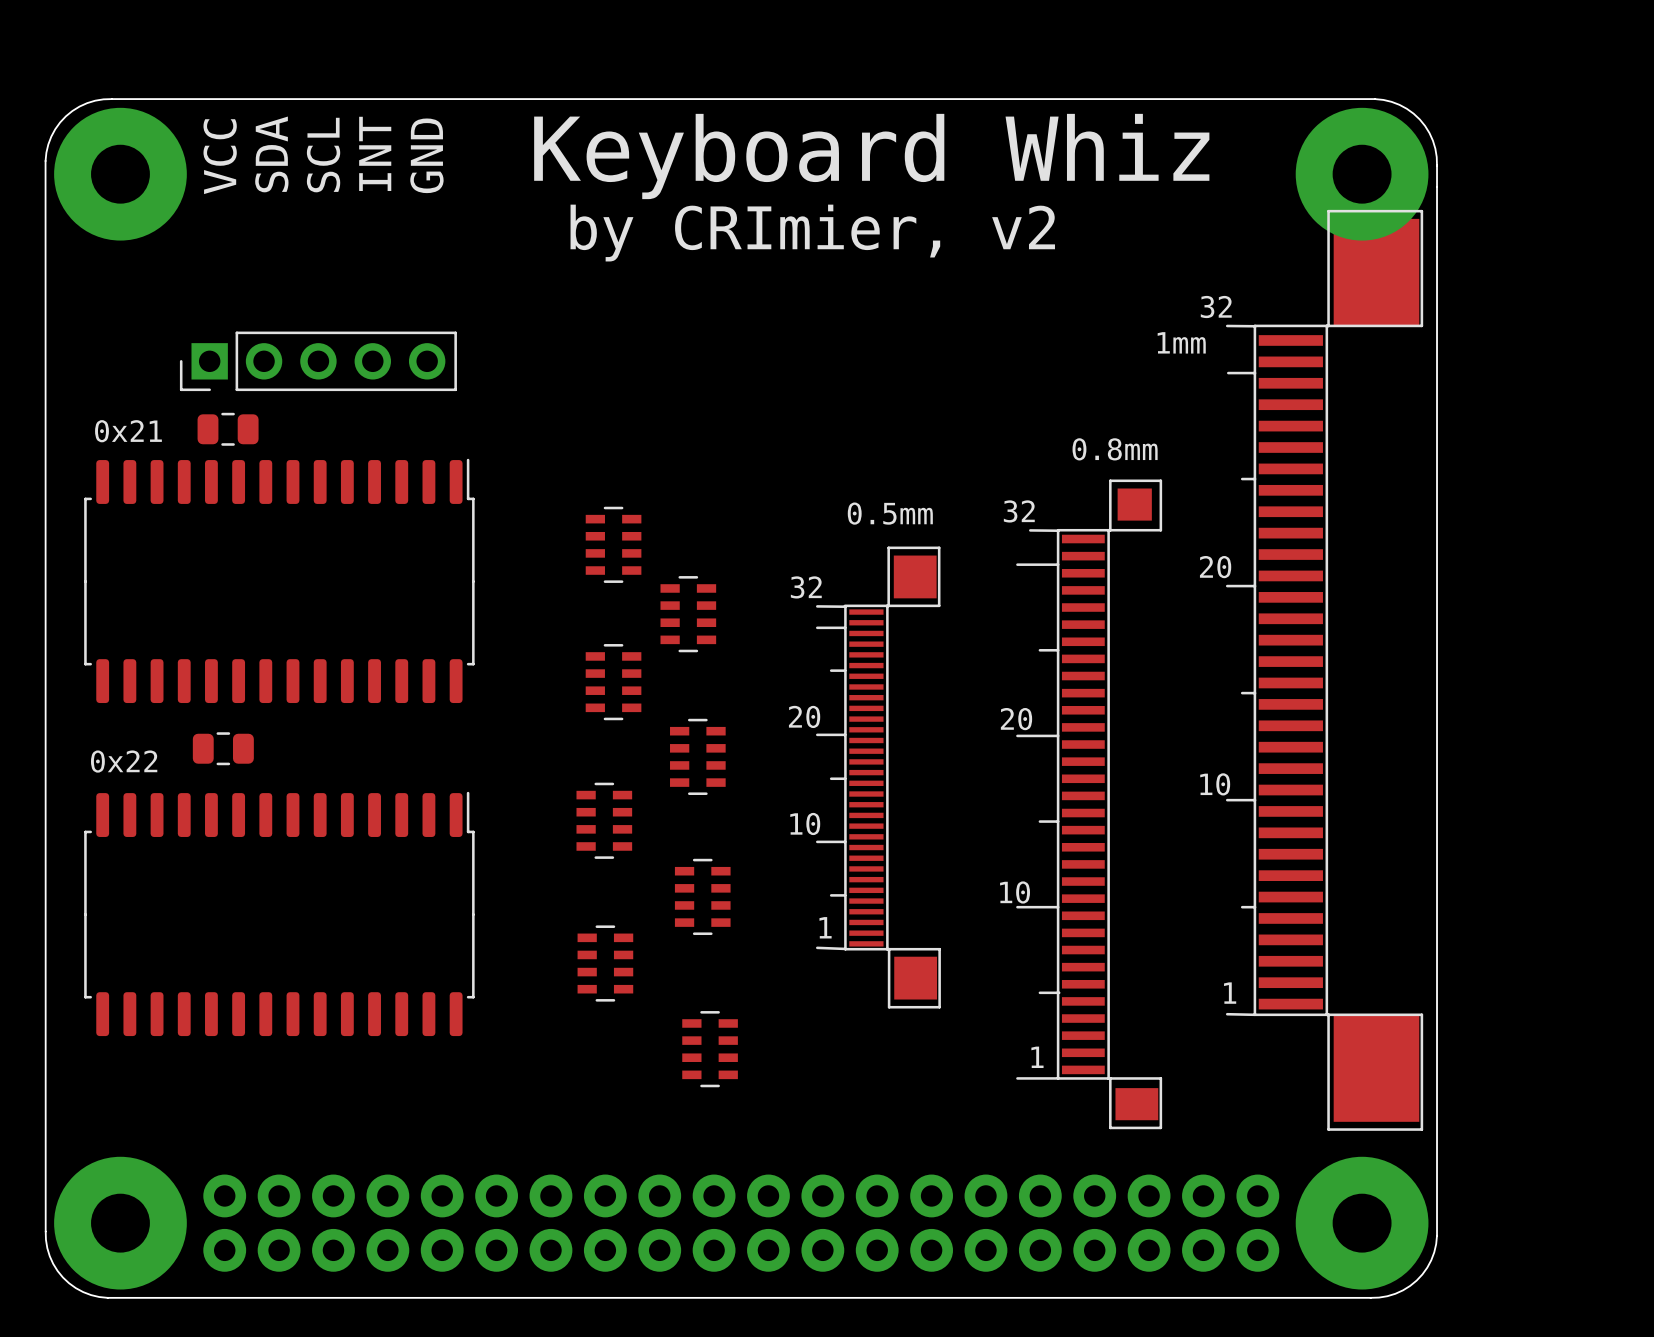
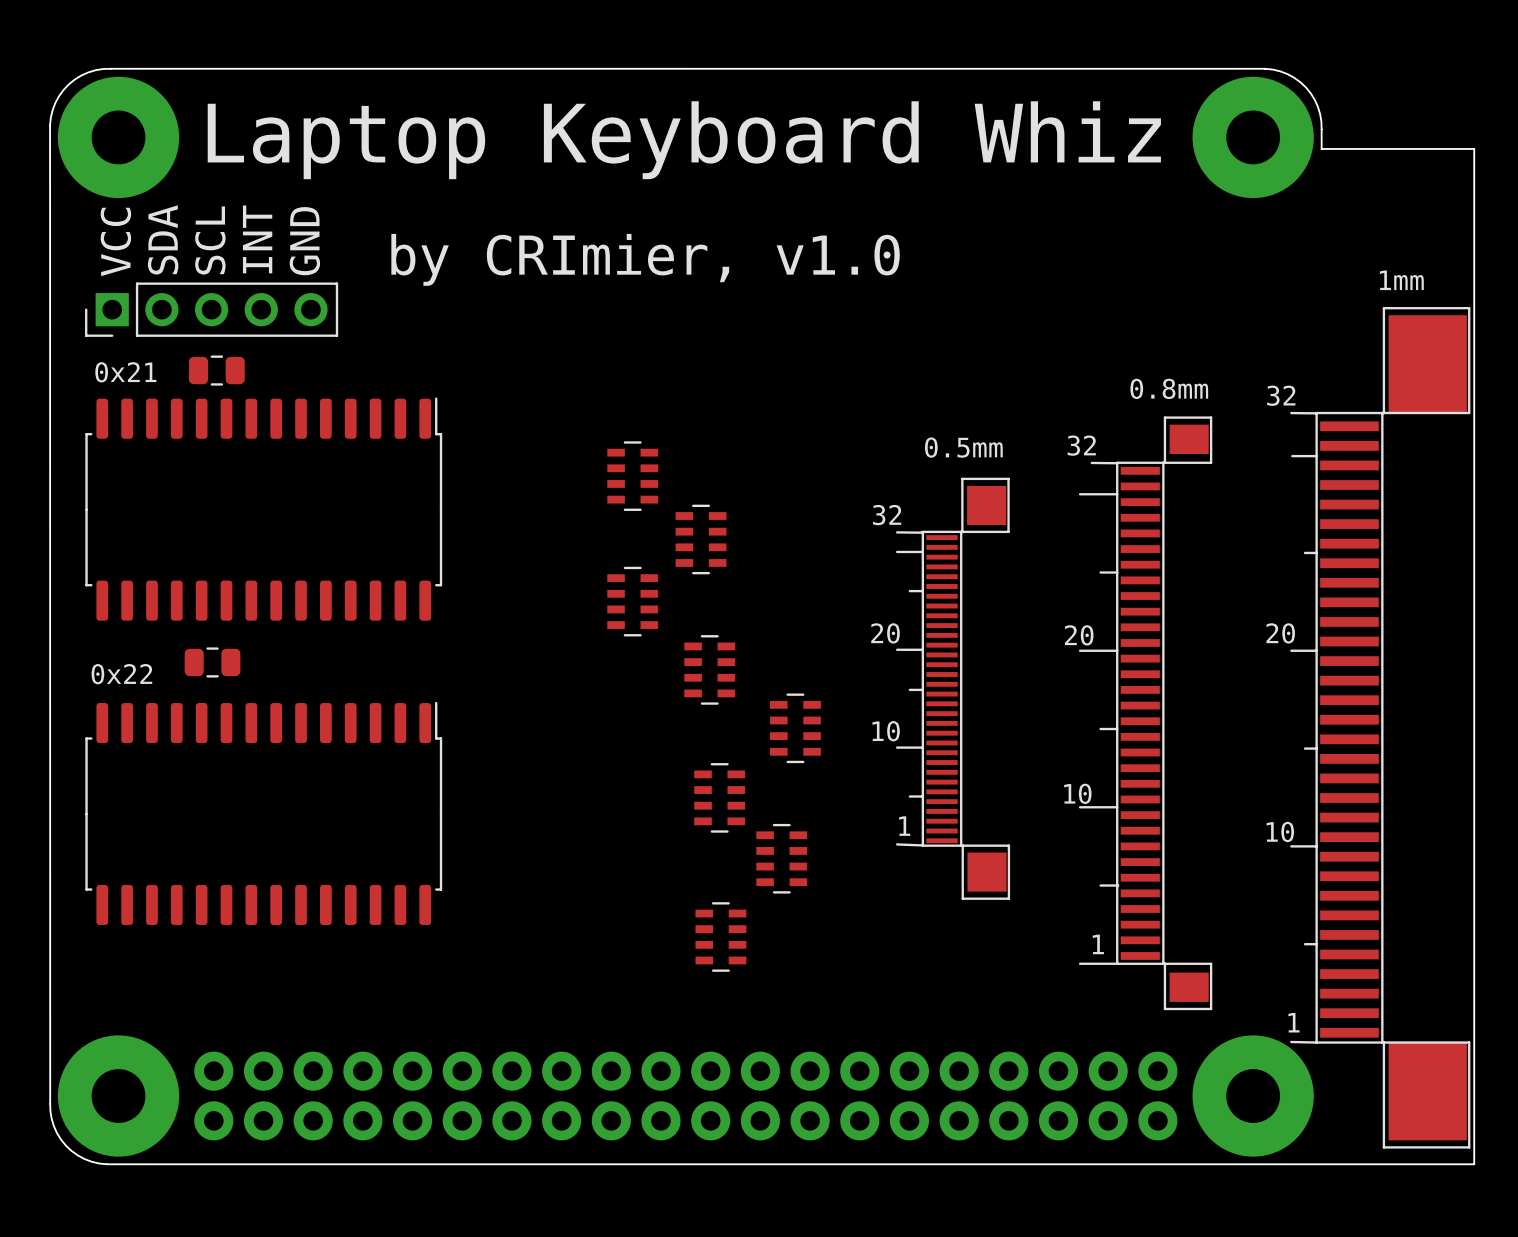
text position: INT (375, 153) -> INT (257, 239)
text position: SDA (271, 154) -> SDA (163, 239)
text position: SCL (323, 155) -> SCL (210, 240)
text position: GND (426, 155) -> GND (304, 241)
text position: VCC (220, 156) -> VCC (115, 241)
text: Keyboard Whiz (871, 156) -> Laptop Keyboard Whiz (684, 140)
board edge: (1437, 186) (1437, 1235) (1431, 1260) (1416, 1280) (1395, 1293) (1370, 1297) -> (1321, 148) (1474, 148) (1474, 1164) (1260, 1164)
text: by CRImier, v2 (812, 233) -> by CRImier, v1.0 (645, 259)
text: 32 (1216, 307) -> none
line: (1227, 325) (1255, 326) -> (1291, 413) (1317, 413)
text position: 1mm (1181, 342) -> 1mm (1401, 280)
part position: (318, 361) -> (211, 309)
line: (1228, 373) (1255, 373) -> (1292, 456) (1316, 456)
text position: 0.8mm (1115, 449) -> 0.8mm (1169, 388)
text: none -> 32 (1281, 395)
line: (1242, 479) (1255, 479) -> (1305, 552) (1316, 552)
text: 32 (1019, 511) -> none
text: none -> 32 (1081, 445)
text position: 0.5mm (890, 513) -> 0.5mm (963, 447)
line: (1030, 530) (1058, 530) -> (1091, 462) (1117, 463)
part: (613, 544) -> none
part: none -> (632, 476)
line: (1017, 564) (1058, 564) -> (1080, 494) (1117, 494)
text: 20 (1215, 567) -> none
line: (1227, 586) (1255, 586) -> (1291, 650) (1316, 650)
text: 32 (806, 587) -> none
text: none -> 32 (887, 515)
line: (817, 606) (845, 606) -> (897, 532) (922, 532)
part: (688, 614) -> none
part: none -> (701, 539)
line: (817, 627) (845, 627) -> (897, 551) (922, 551)
line: (1039, 650) (1058, 650) -> (1100, 572) (1117, 572)
line: (831, 670) (845, 670) -> (909, 591) (922, 591)
part position: (1338, 670) -> (1392, 727)
part: (613, 682) -> none
part: none -> (632, 601)
line: (1242, 693) (1255, 693) -> (1305, 748) (1316, 748)
text: 20 (804, 716) -> none
text: none -> 20 (1280, 633)
text position: 20 (1016, 719) -> 20 (885, 633)
text: none -> 20 (1079, 635)
line: (817, 734) (845, 734) -> (897, 649) (922, 649)
line: (1017, 735) (1058, 735) -> (1080, 650) (1117, 650)
part: (697, 756) -> none
part: none -> (709, 669)
part position: (892, 777) -> (965, 688)
line: (831, 778) (845, 778) -> (909, 689) (922, 689)
text: 10 (1215, 784) -> none
line: (1227, 800) (1255, 800) -> (1291, 846) (1316, 846)
part: (1109, 804) -> none
part: none -> (1164, 713)
part: (604, 820) -> none
part: none -> (795, 728)
line: (1039, 821) (1058, 821) -> (1100, 729) (1117, 729)
text: 10 (805, 823) -> none
text: none -> 10 (886, 731)
line: (817, 841) (845, 841) -> (897, 747) (922, 747)
text: 10 (1015, 892) -> 1 (904, 826)
text: none -> 10 (1077, 793)
line: (831, 895) (845, 895) -> (909, 796) (922, 796)
part position: (702, 896) -> (719, 797)
line: (1017, 907) (1058, 907) -> (1080, 807) (1117, 807)
line: (1242, 907) (1255, 907) -> (1305, 944) (1316, 944)
text: 1 (825, 927) -> none
text: none -> 10 (1280, 831)
line: (817, 947) (845, 948) -> (897, 844) (922, 845)
part: (605, 963) -> none
part: none -> (781, 858)
line: (1039, 992) (1059, 992) -> (1100, 885) (1118, 885)
text position: 1 (1230, 993) -> 1 (1098, 944)
line: (1227, 1014) (1254, 1014) -> (1291, 1042) (1316, 1042)
part position: (710, 1049) -> (720, 937)
text: 1 (1037, 1057) -> none
line: (1017, 1078) (1058, 1078) -> (1080, 963) (1117, 963)
text: none -> 1 (1293, 1022)

